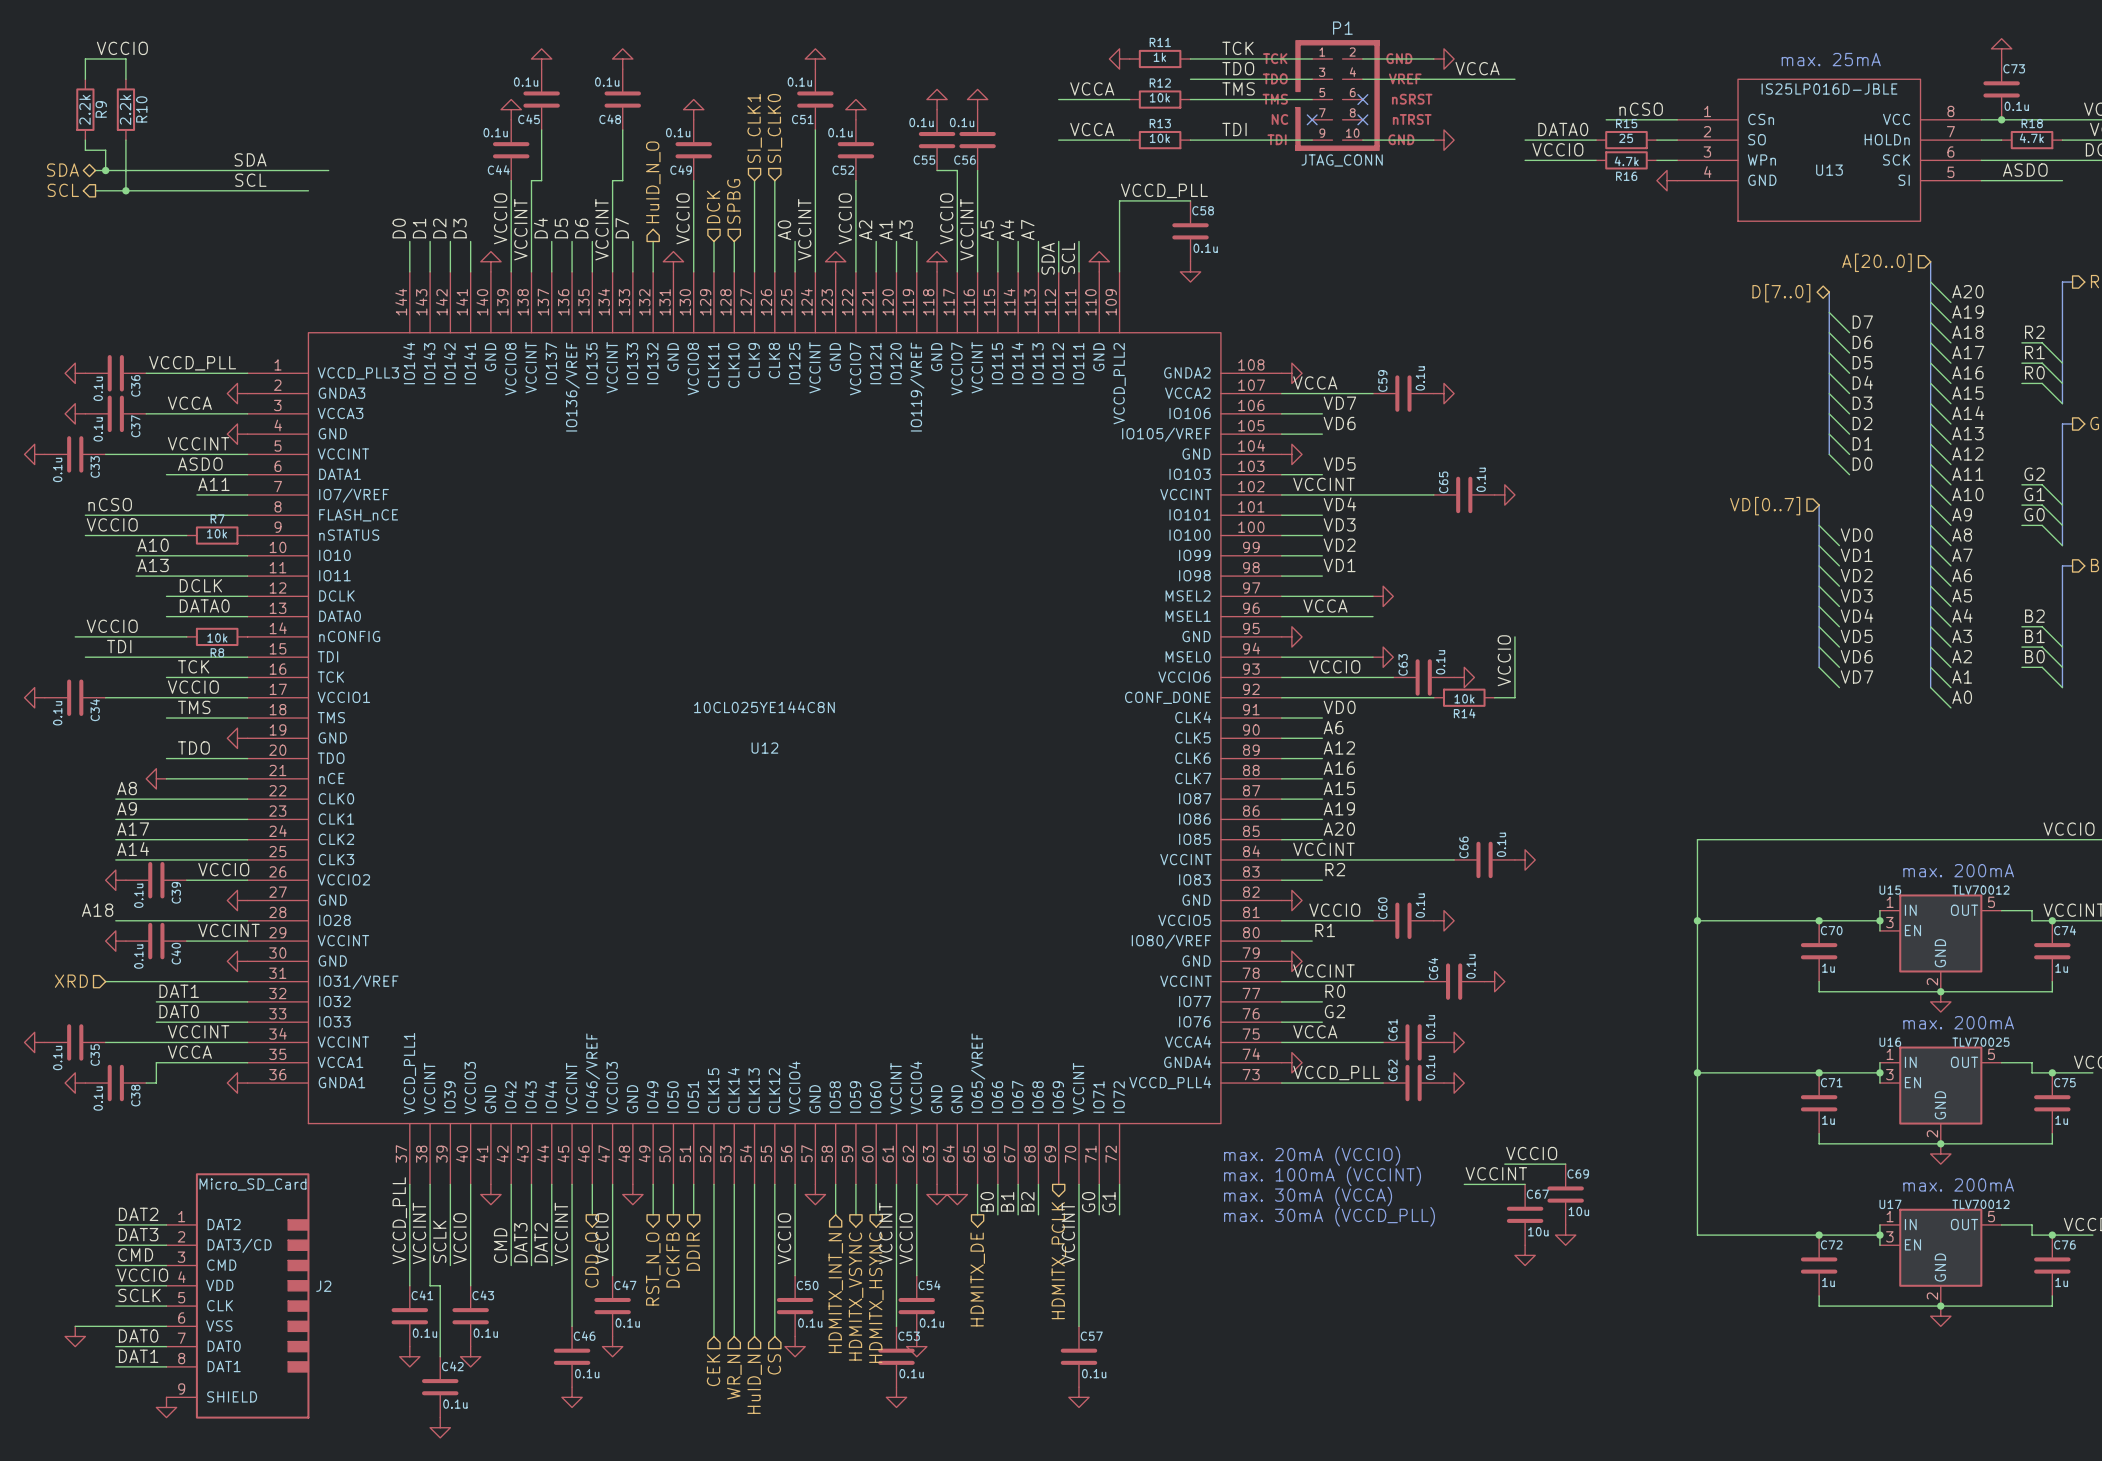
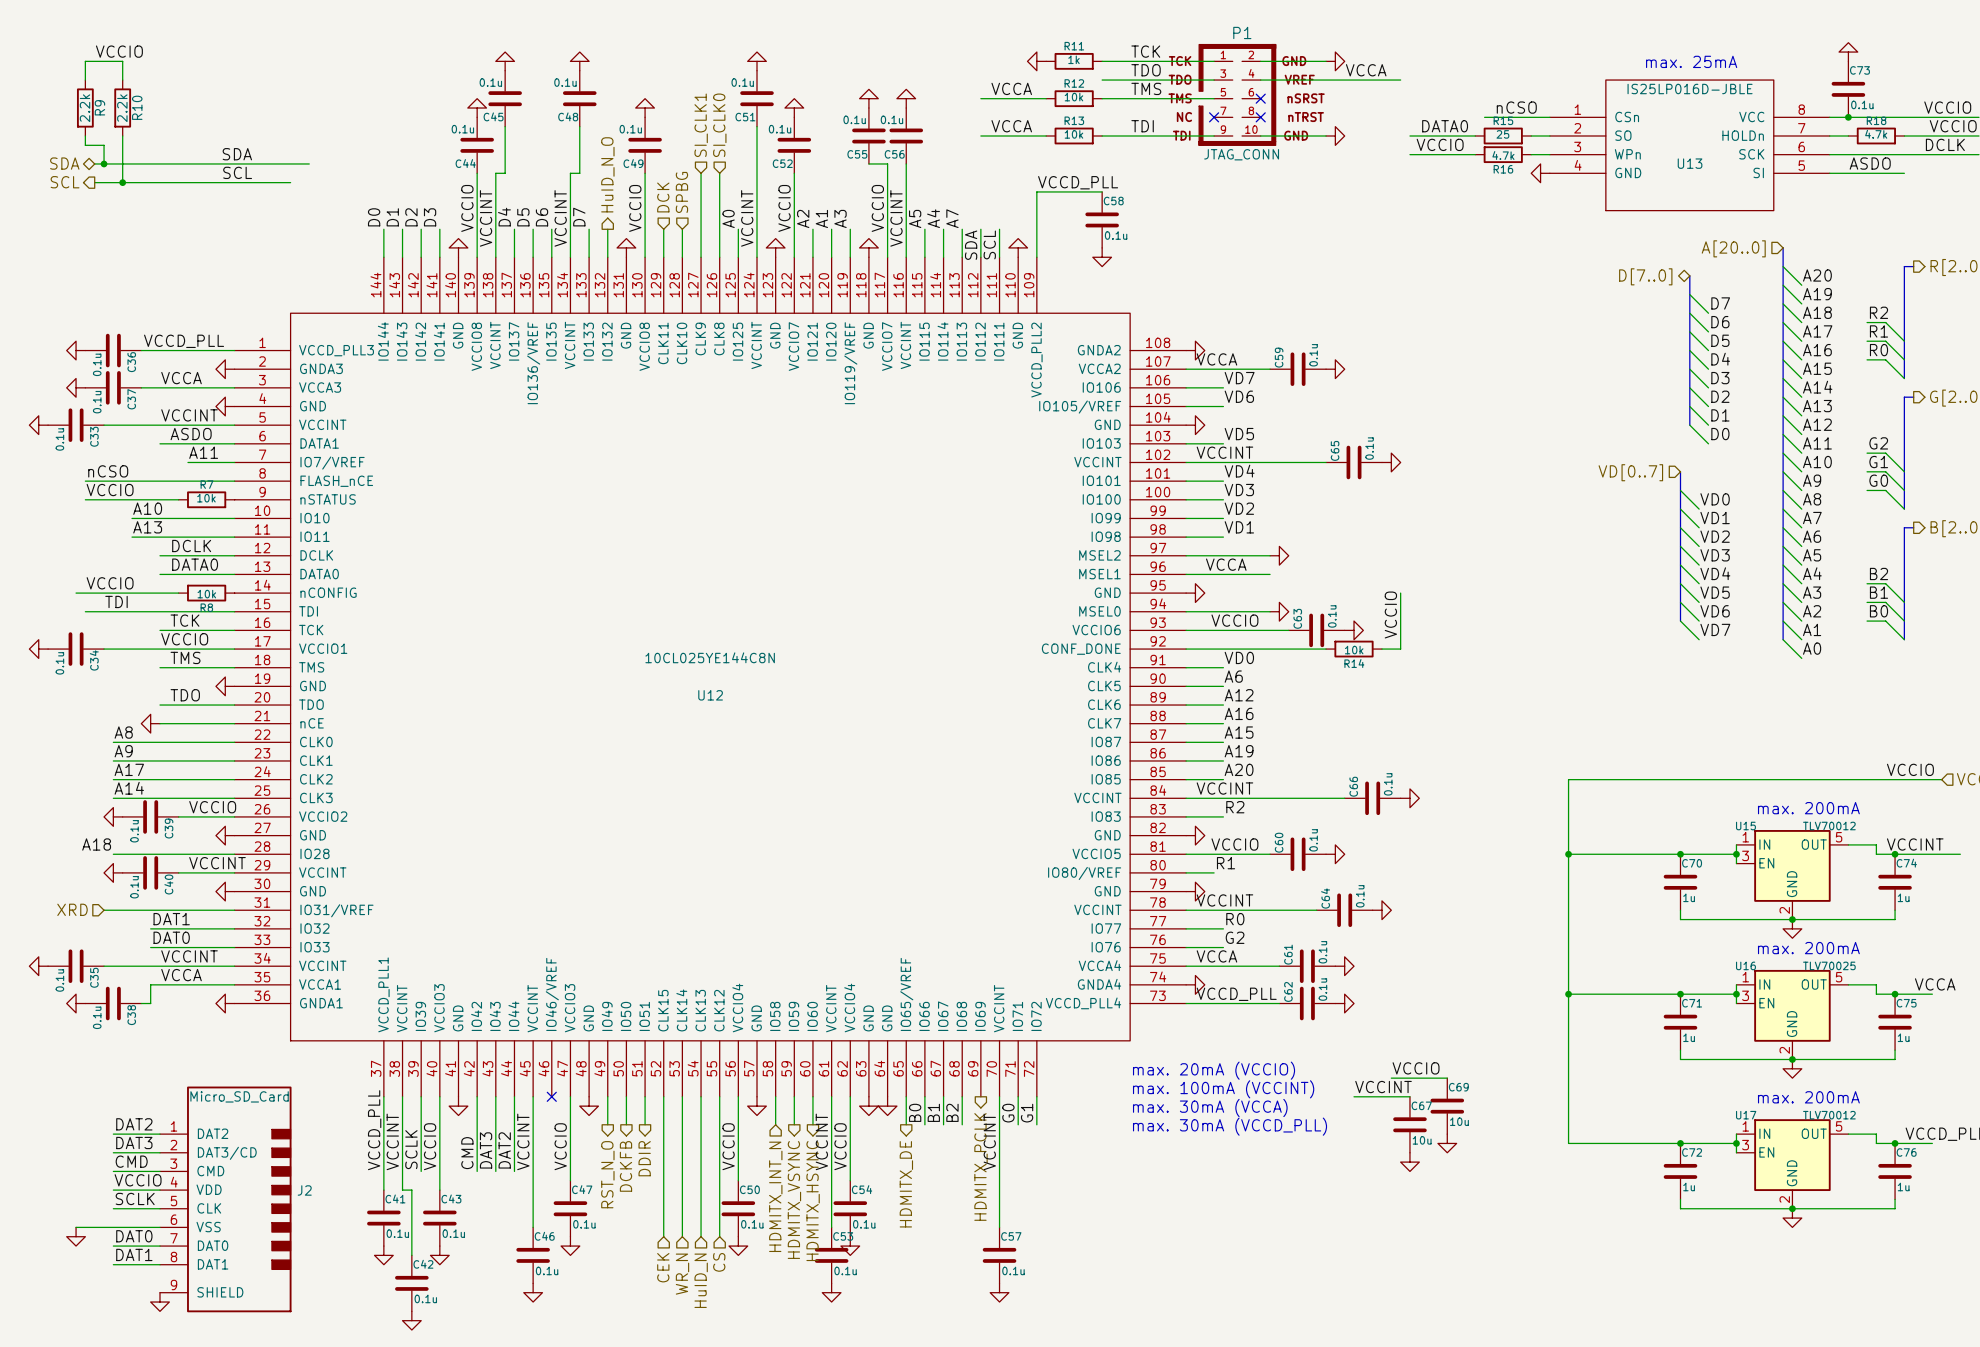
wire: (592, 1184) (592, 1214) -> none
no-connect mark: none -> (551, 1096)
hierarchical label: CDD_O (592, 1260) -> none

